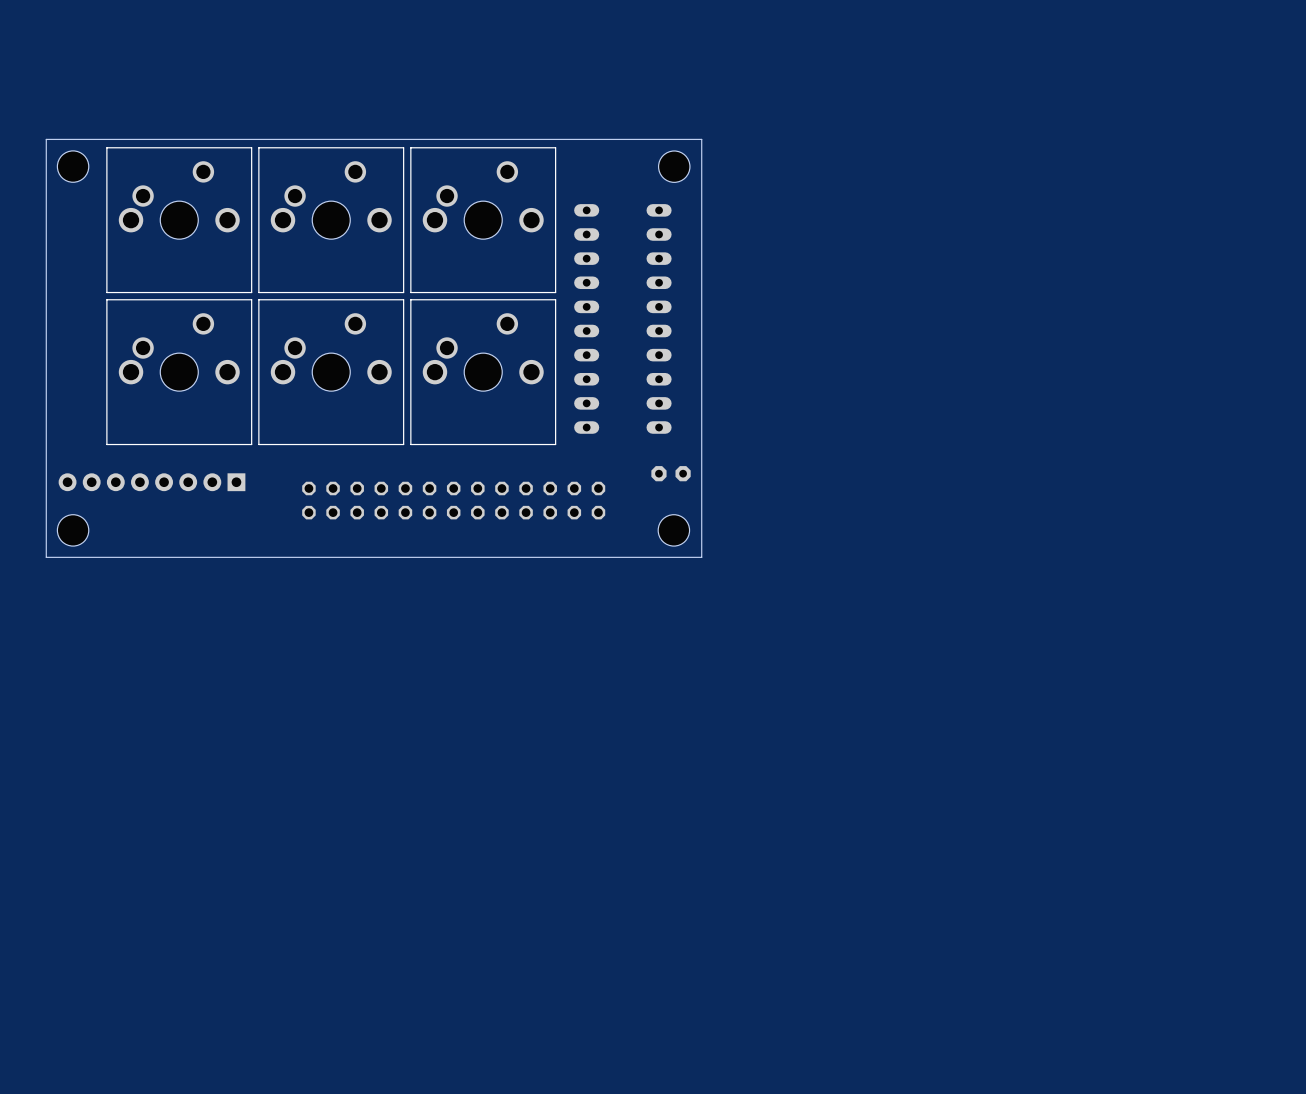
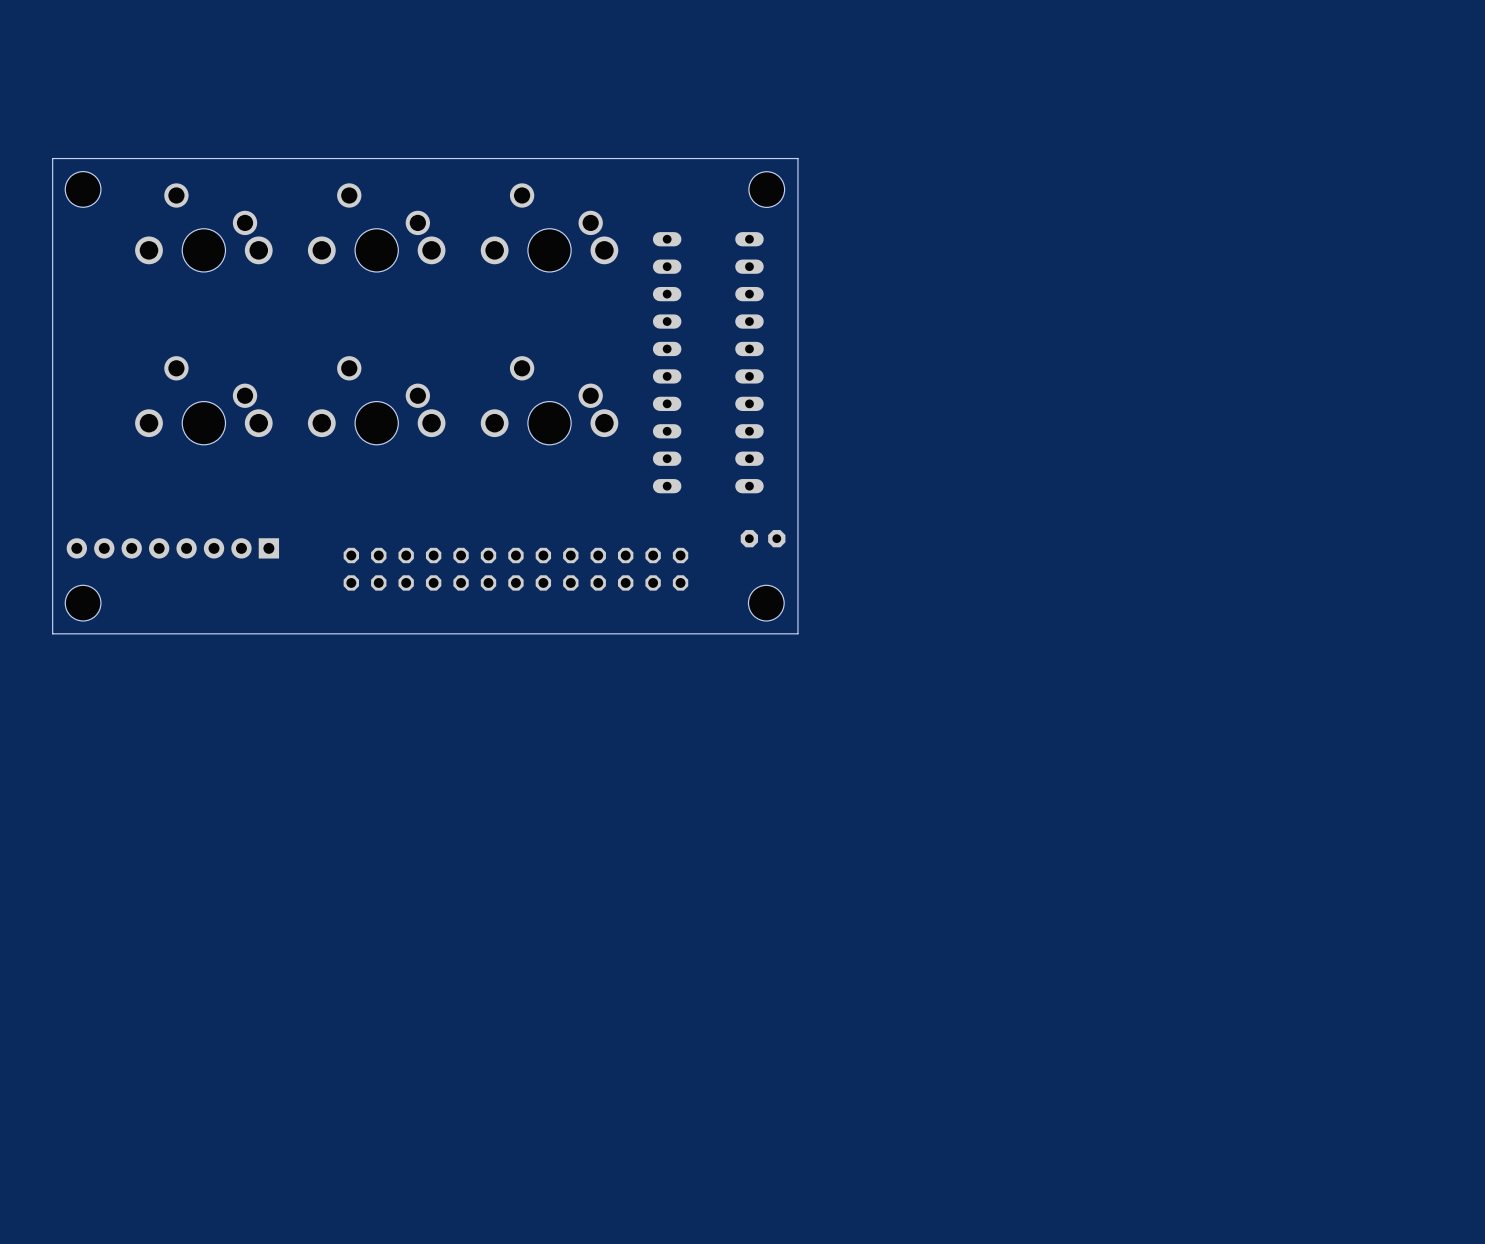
part side: bottom (179, 220) -> top (203, 227)
part side: bottom (331, 220) -> top (376, 227)
part side: bottom (483, 220) -> top (549, 227)
part side: bottom (179, 372) -> top (203, 400)
part side: bottom (331, 372) -> top (376, 400)
part side: bottom (483, 372) -> top (549, 400)

